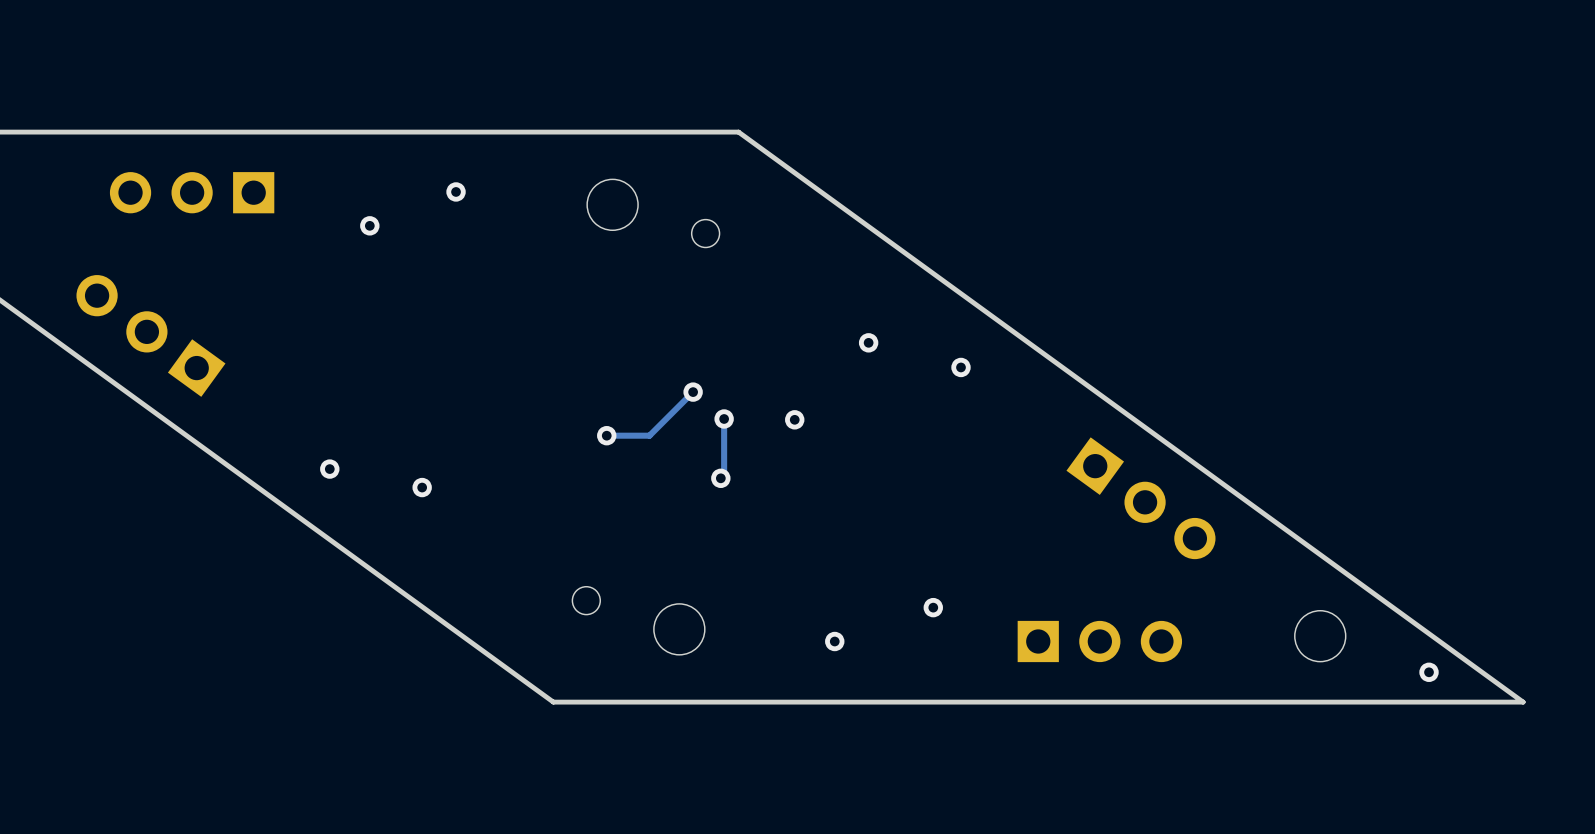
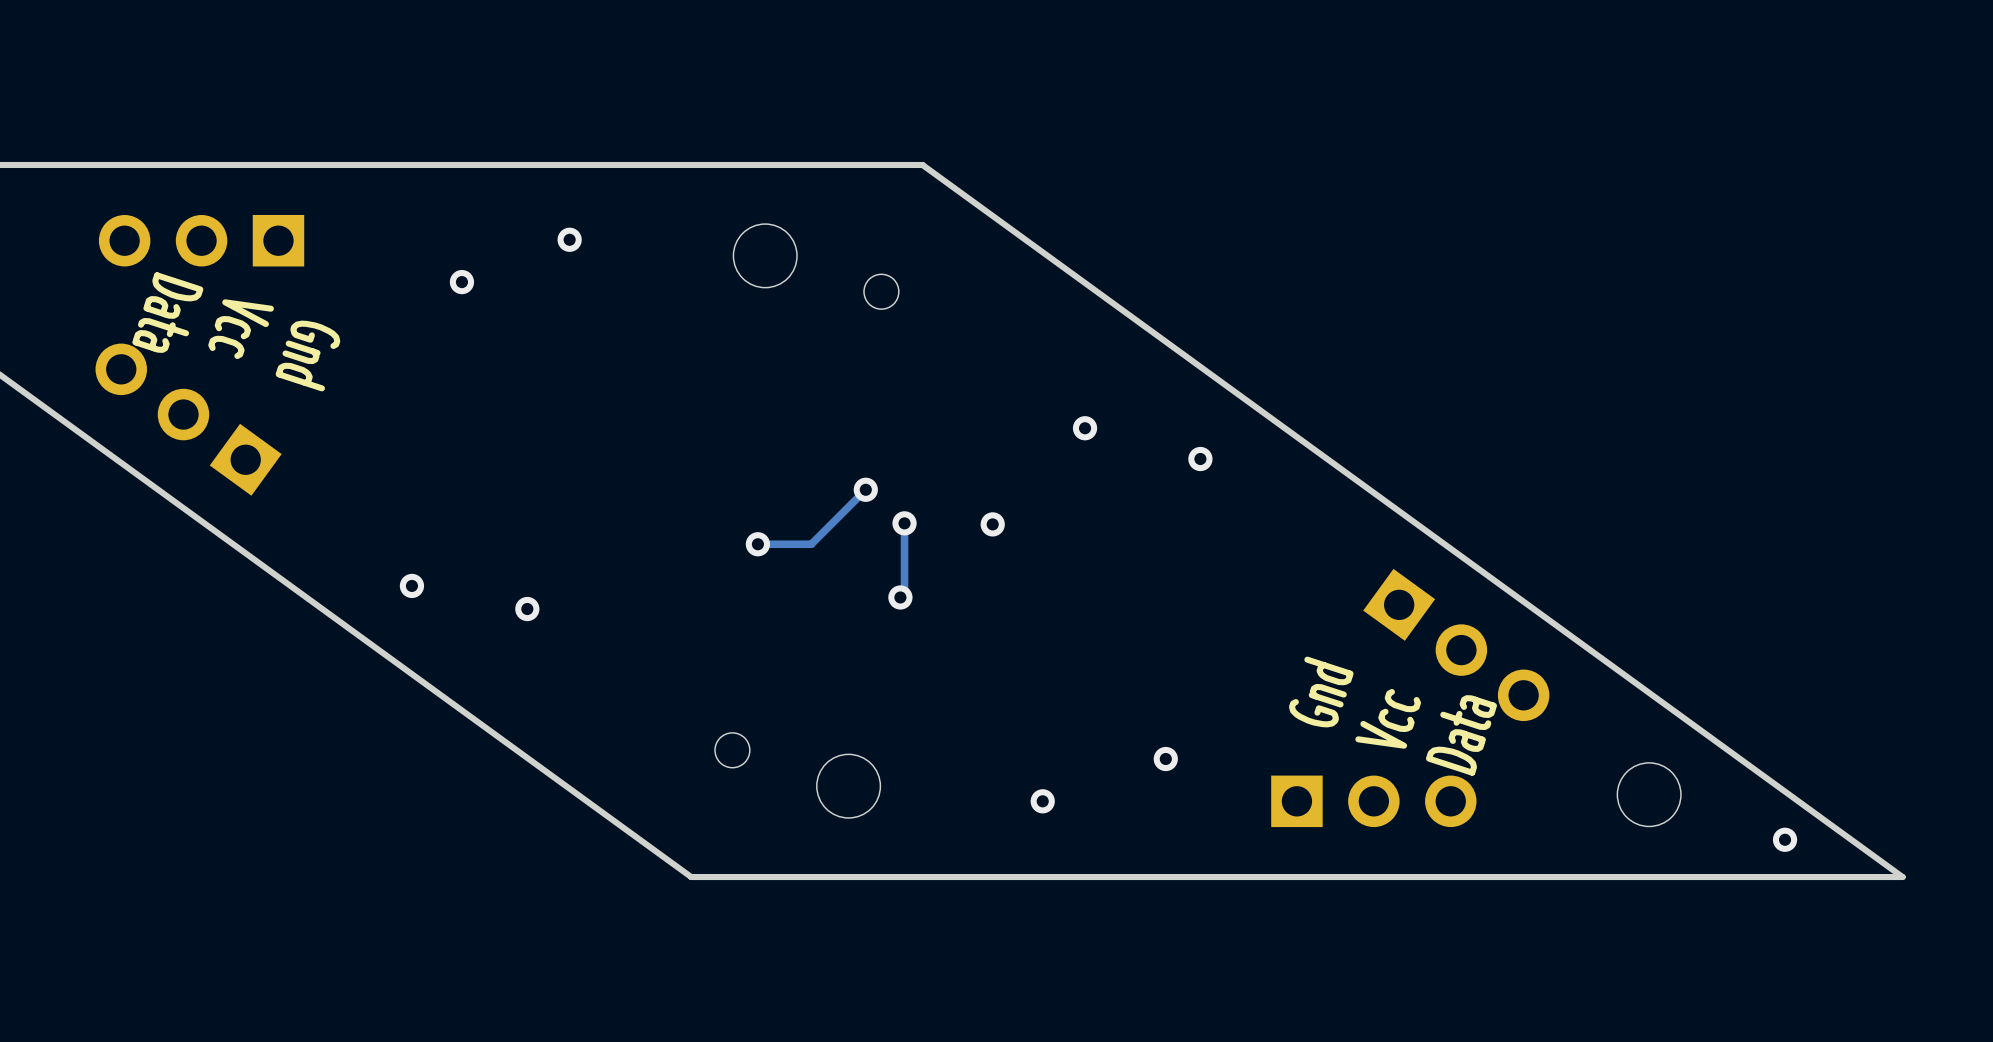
part position: (192, 192) -> (201, 240)
text: none -> Data (167, 312)
text: none -> Vcc (241, 329)
text: none -> Gnd (308, 356)
part position: (1140, 498) -> (1456, 644)
text: none -> Gnd (1321, 692)
text: none -> Vcc (1388, 718)
text: none -> Data (1461, 735)

